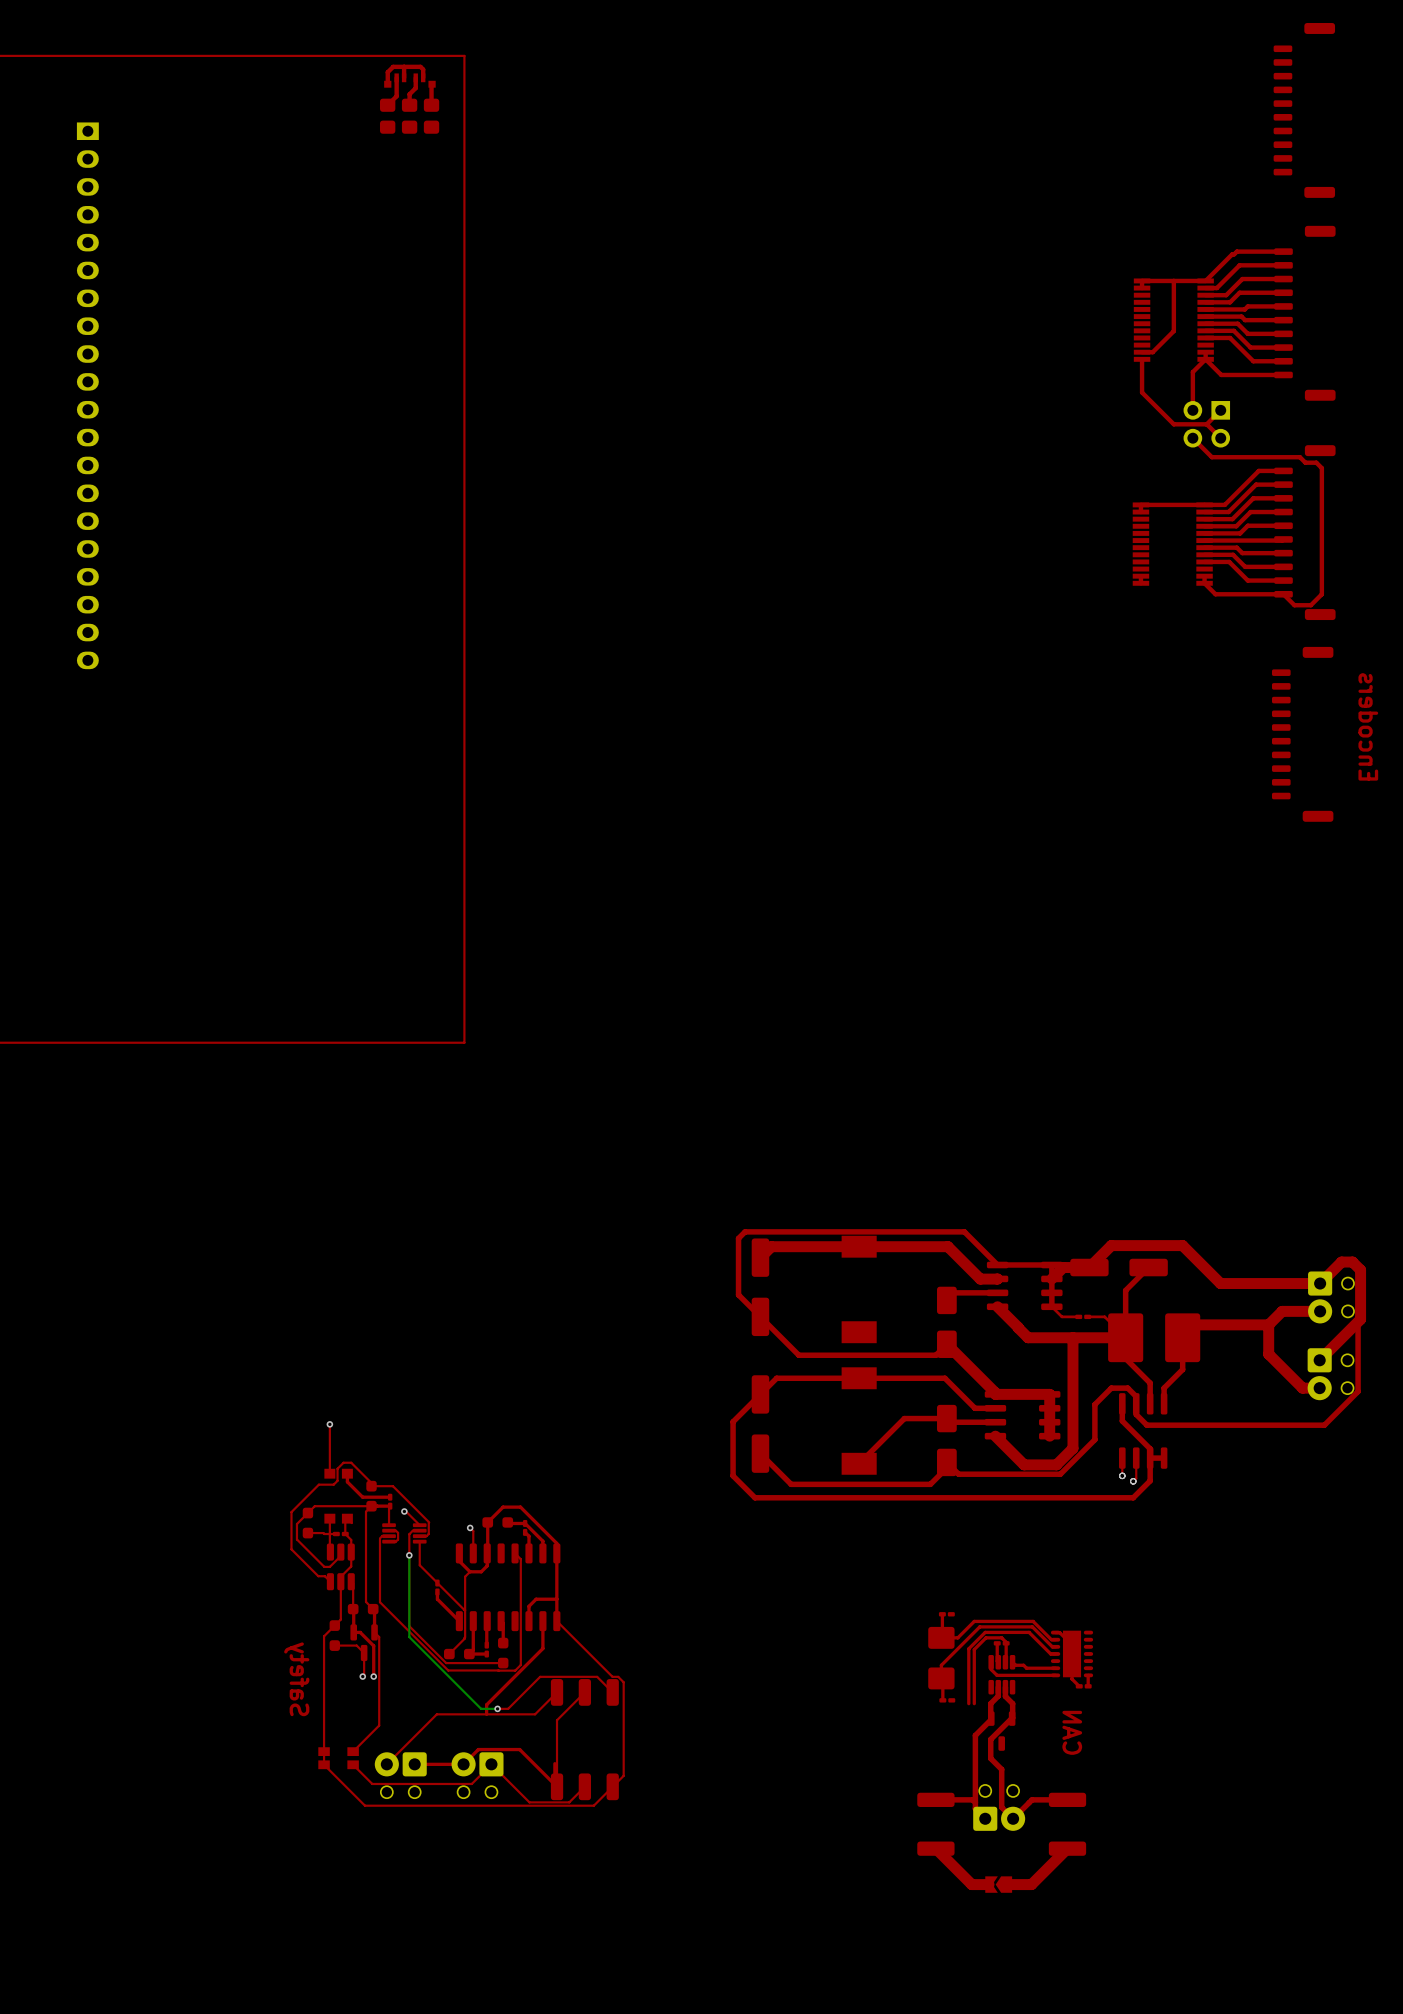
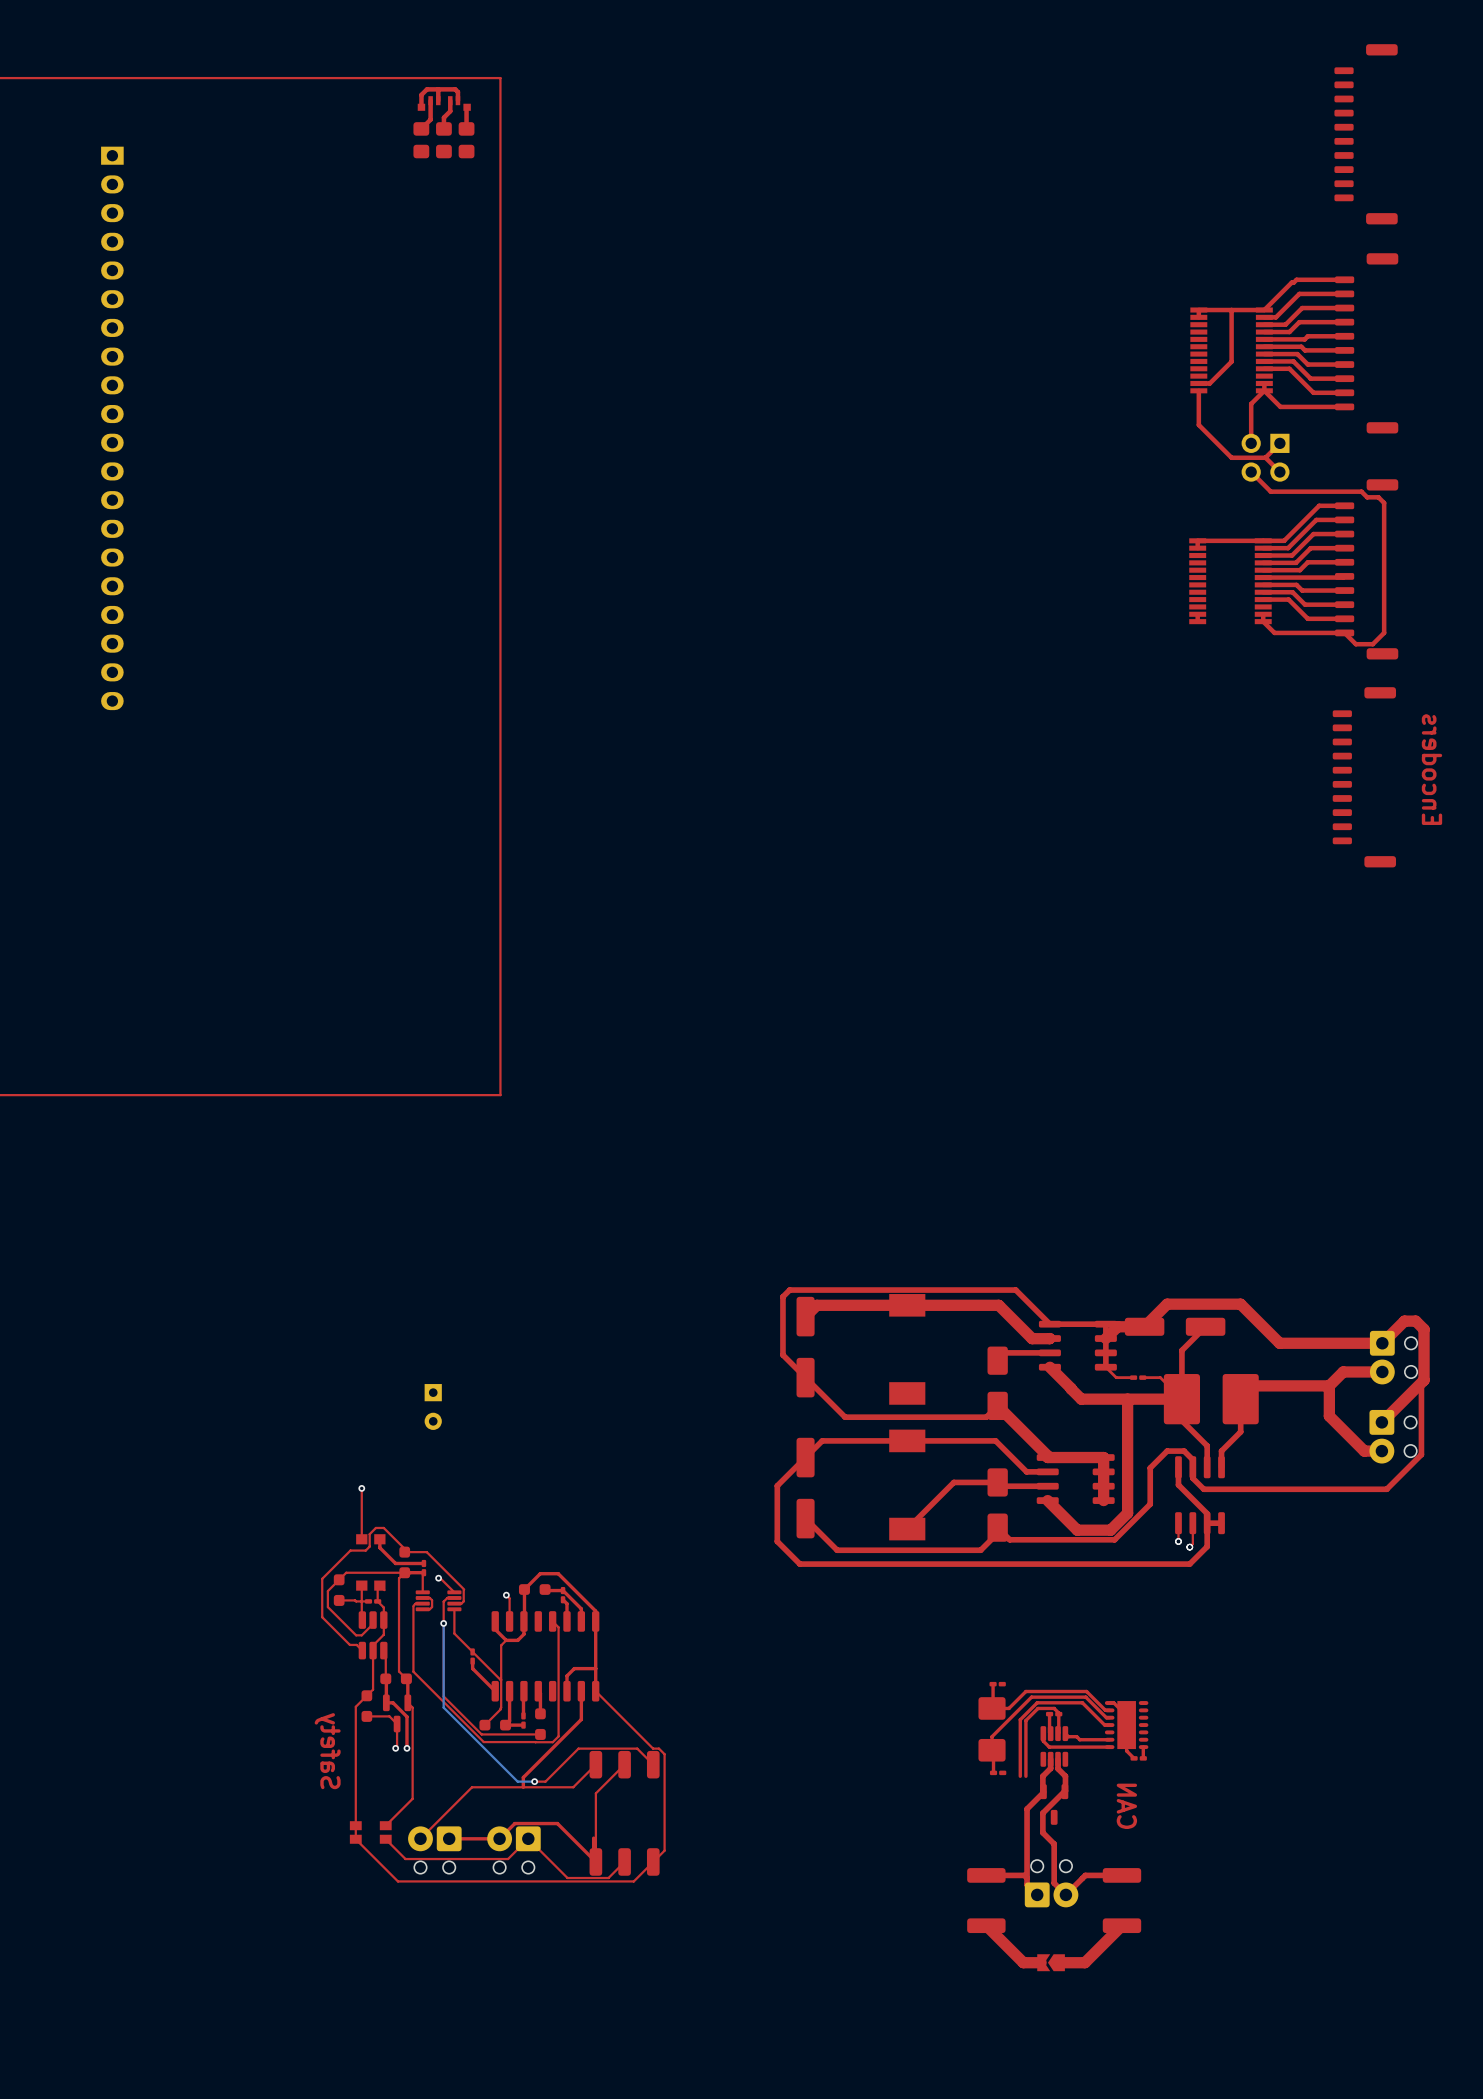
part: none -> (433, 1406)

